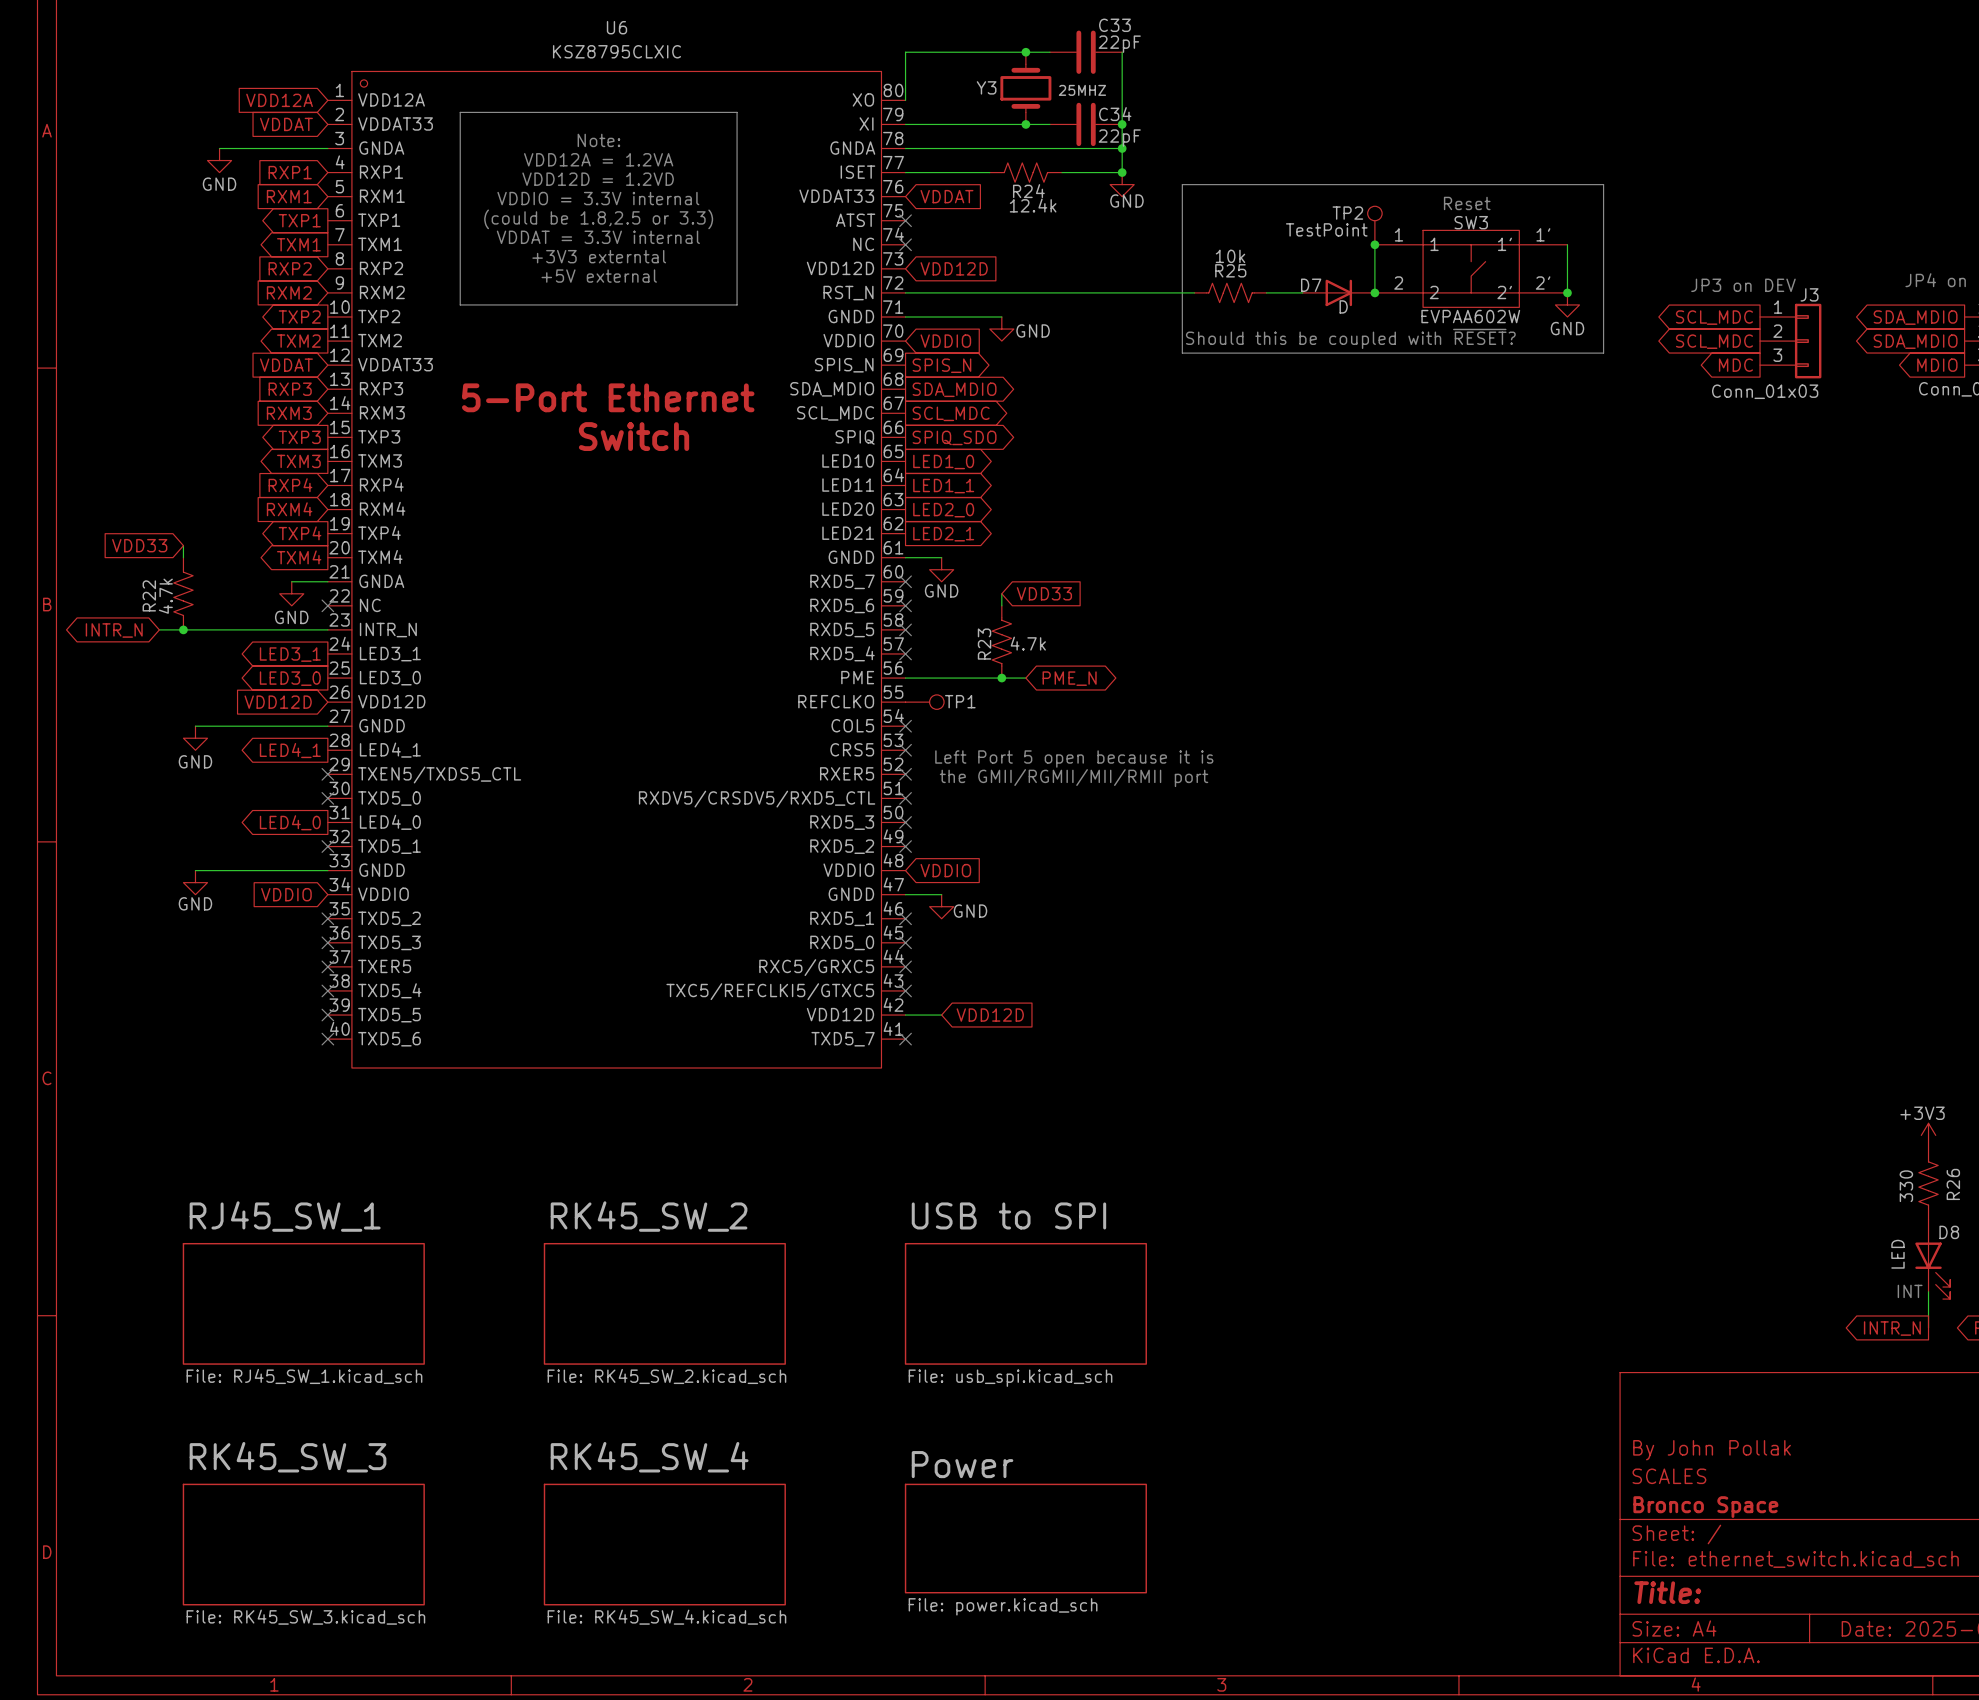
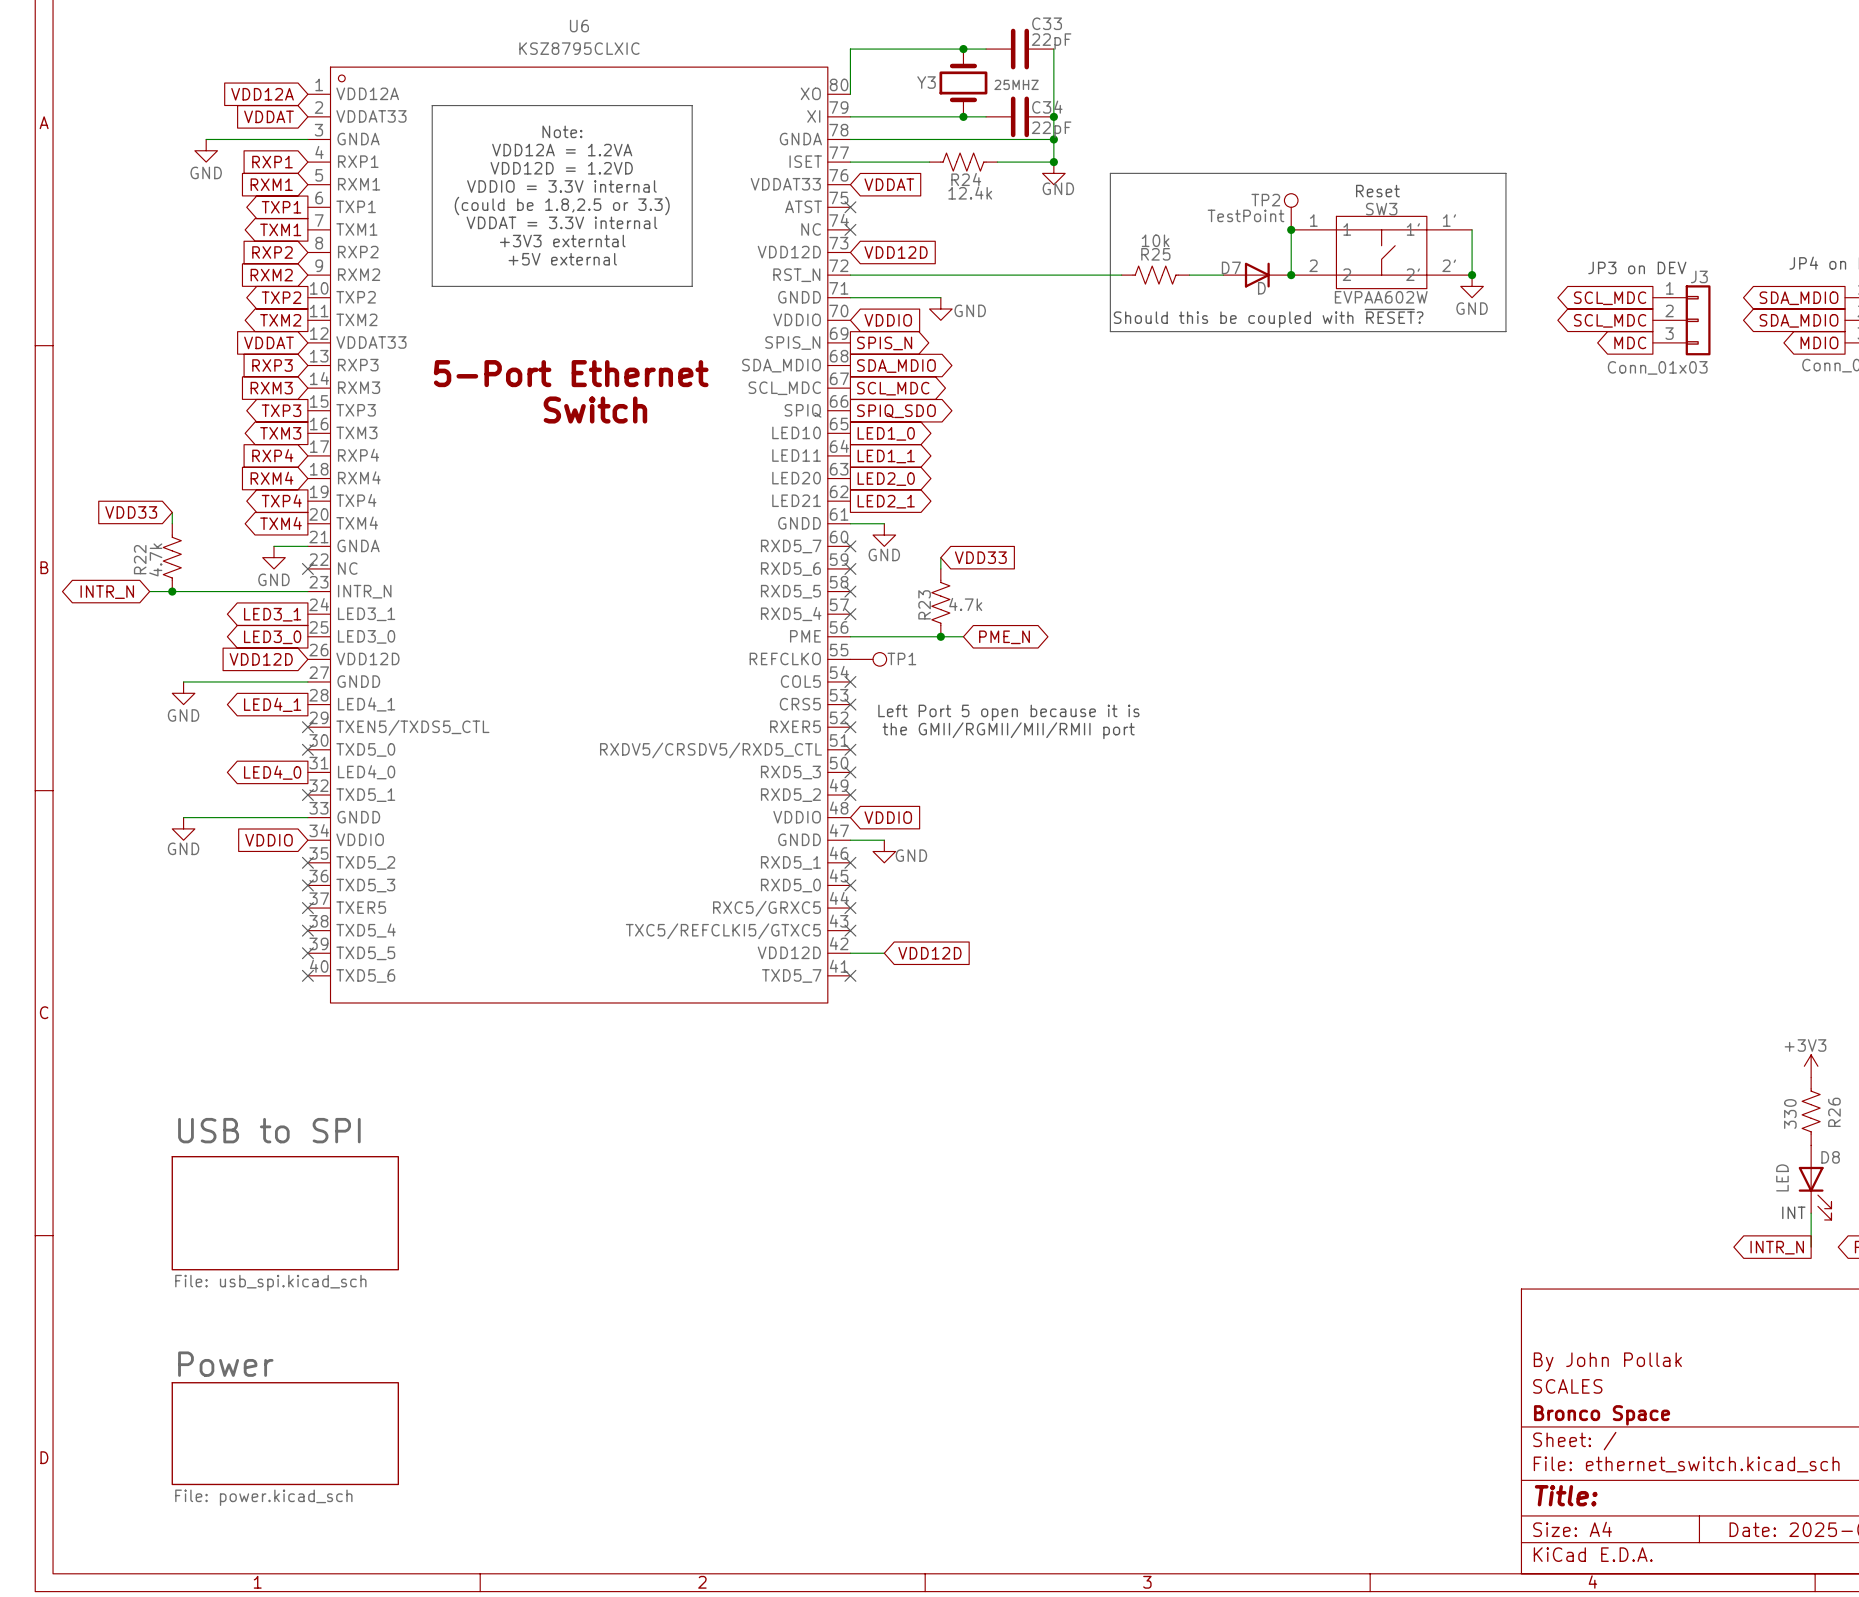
sheet USB to SPI: none -> File: usb_spi.kicad_sch (285, 1213)
sheet RJ45_SW_1: File: RJ45_SW_1.kicad_sch (303, 1303) -> none
sheet RK45_SW_2: File: RK45_SW_2.kicad_sch (664, 1303) -> none
sheet USB to SPI: File: usb_spi.kicad_sch (1025, 1303) -> none
sheet Power: none -> File: power.kicad_sch (285, 1433)
sheet Power: File: power.kicad_sch (1025, 1538) -> none
sheet RK45_SW_3: File: RK45_SW_3.kicad_sch (303, 1544) -> none
sheet RK45_SW_4: File: RK45_SW_4.kicad_sch (664, 1544) -> none

